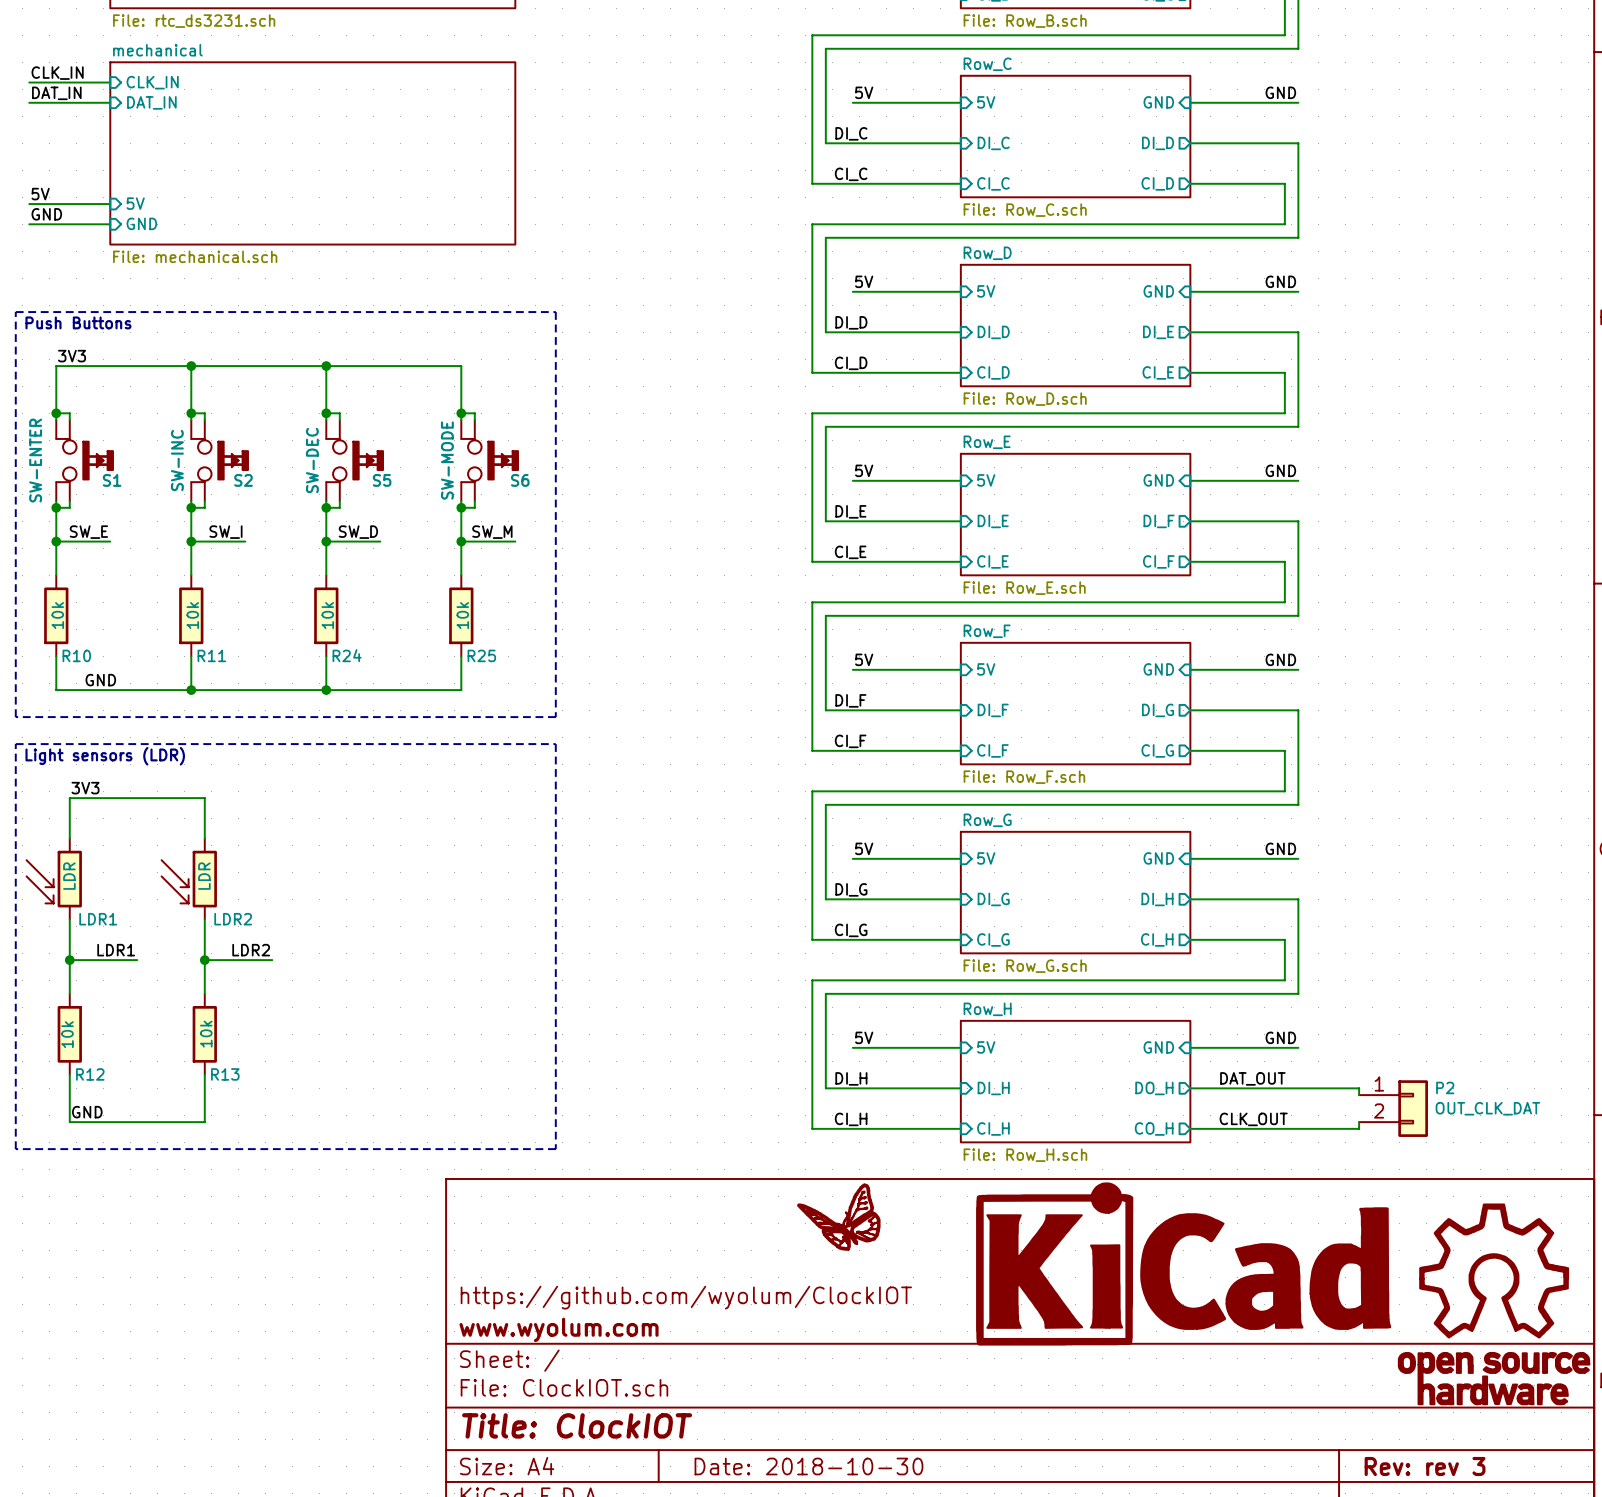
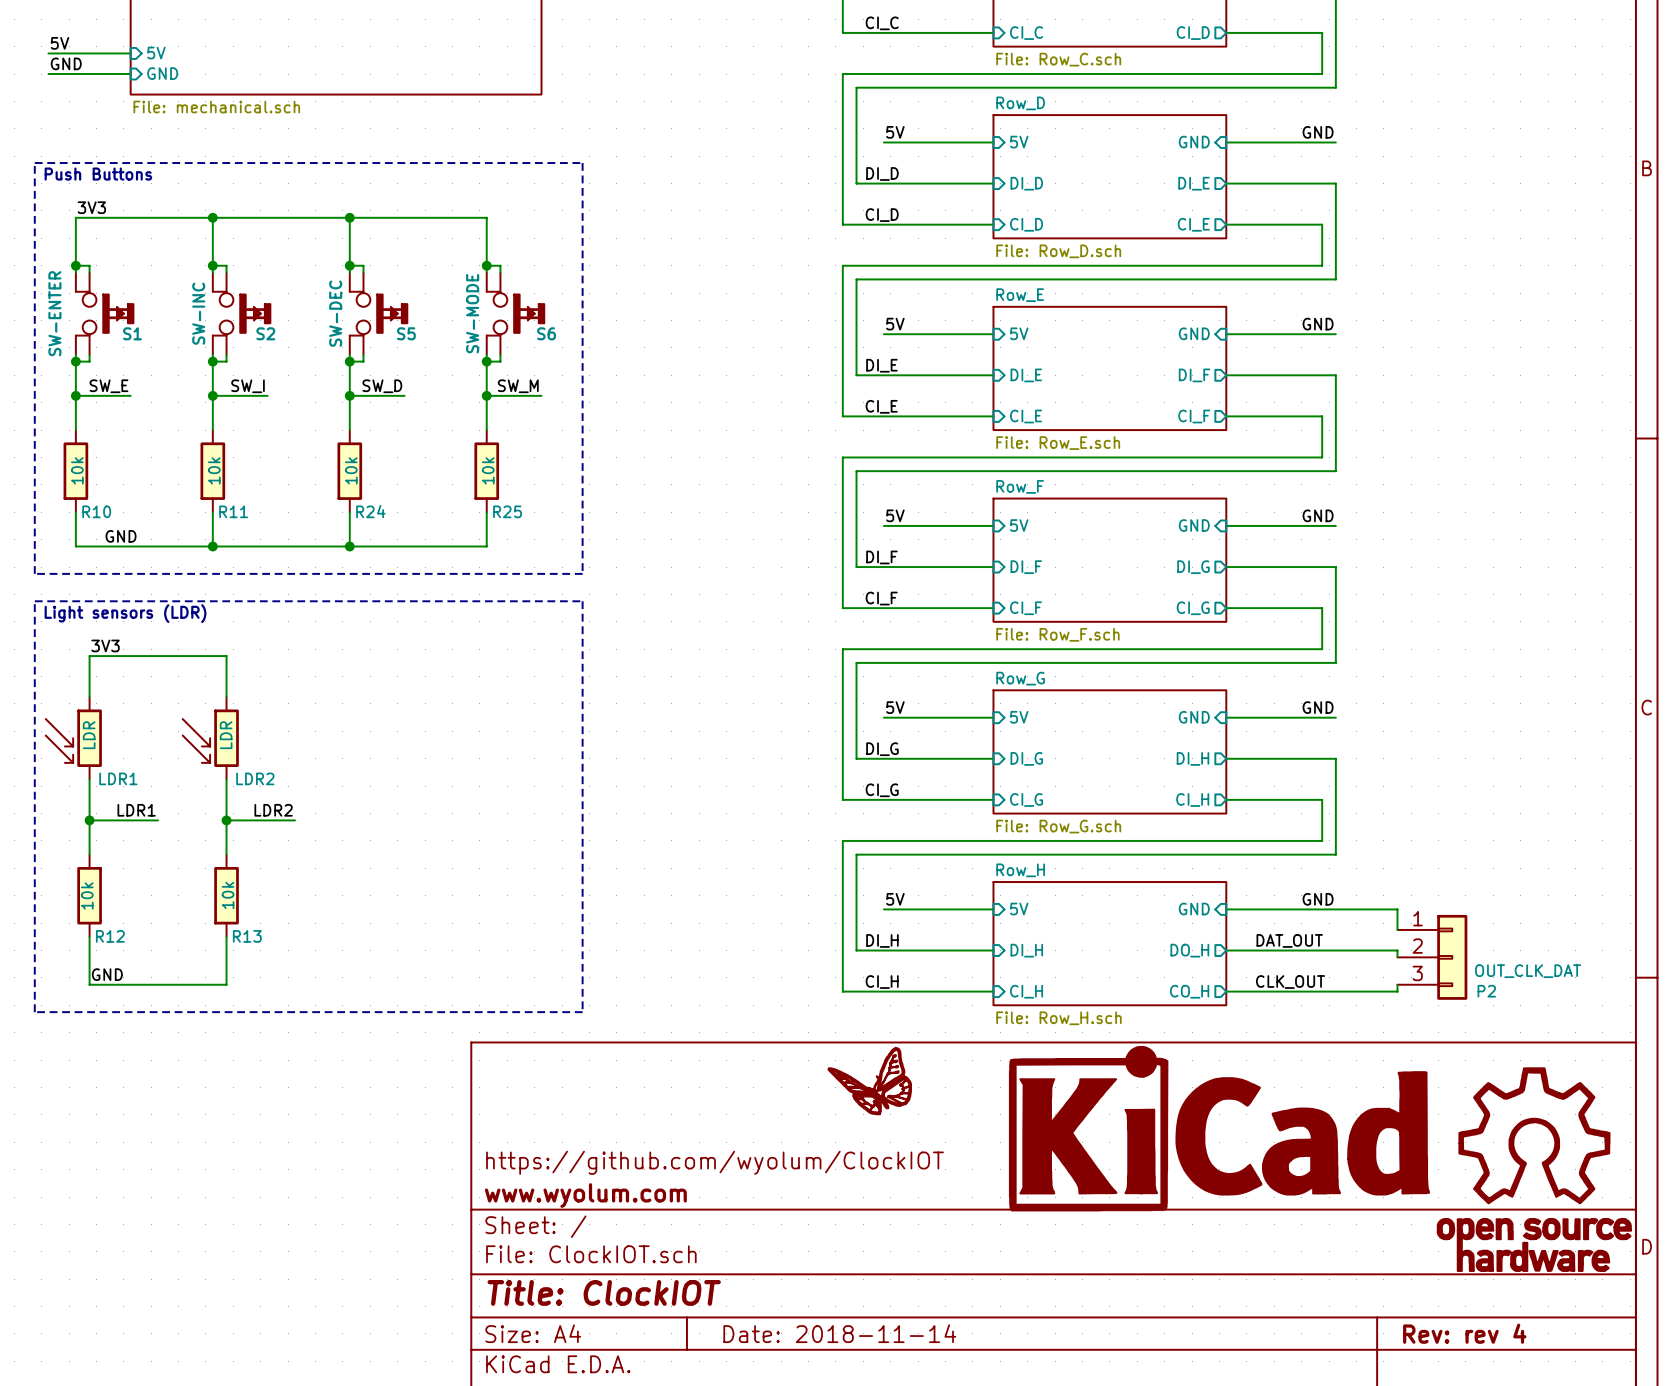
wire: none -> (1335, 909) (1397, 909) (1397, 929)
P2 symbol: [1359, 1080, 1428, 1137] -> [1397, 914, 1468, 1000]
P2 name position: P2 (1445, 1087) -> P2 (1486, 991)
title block: Date: 2018-10-30 (808, 1466) -> Date: 2018-11-14 (839, 1333)
title block: Rev: rev 3 (1425, 1466) -> Rev: rev 4 (1464, 1333)

